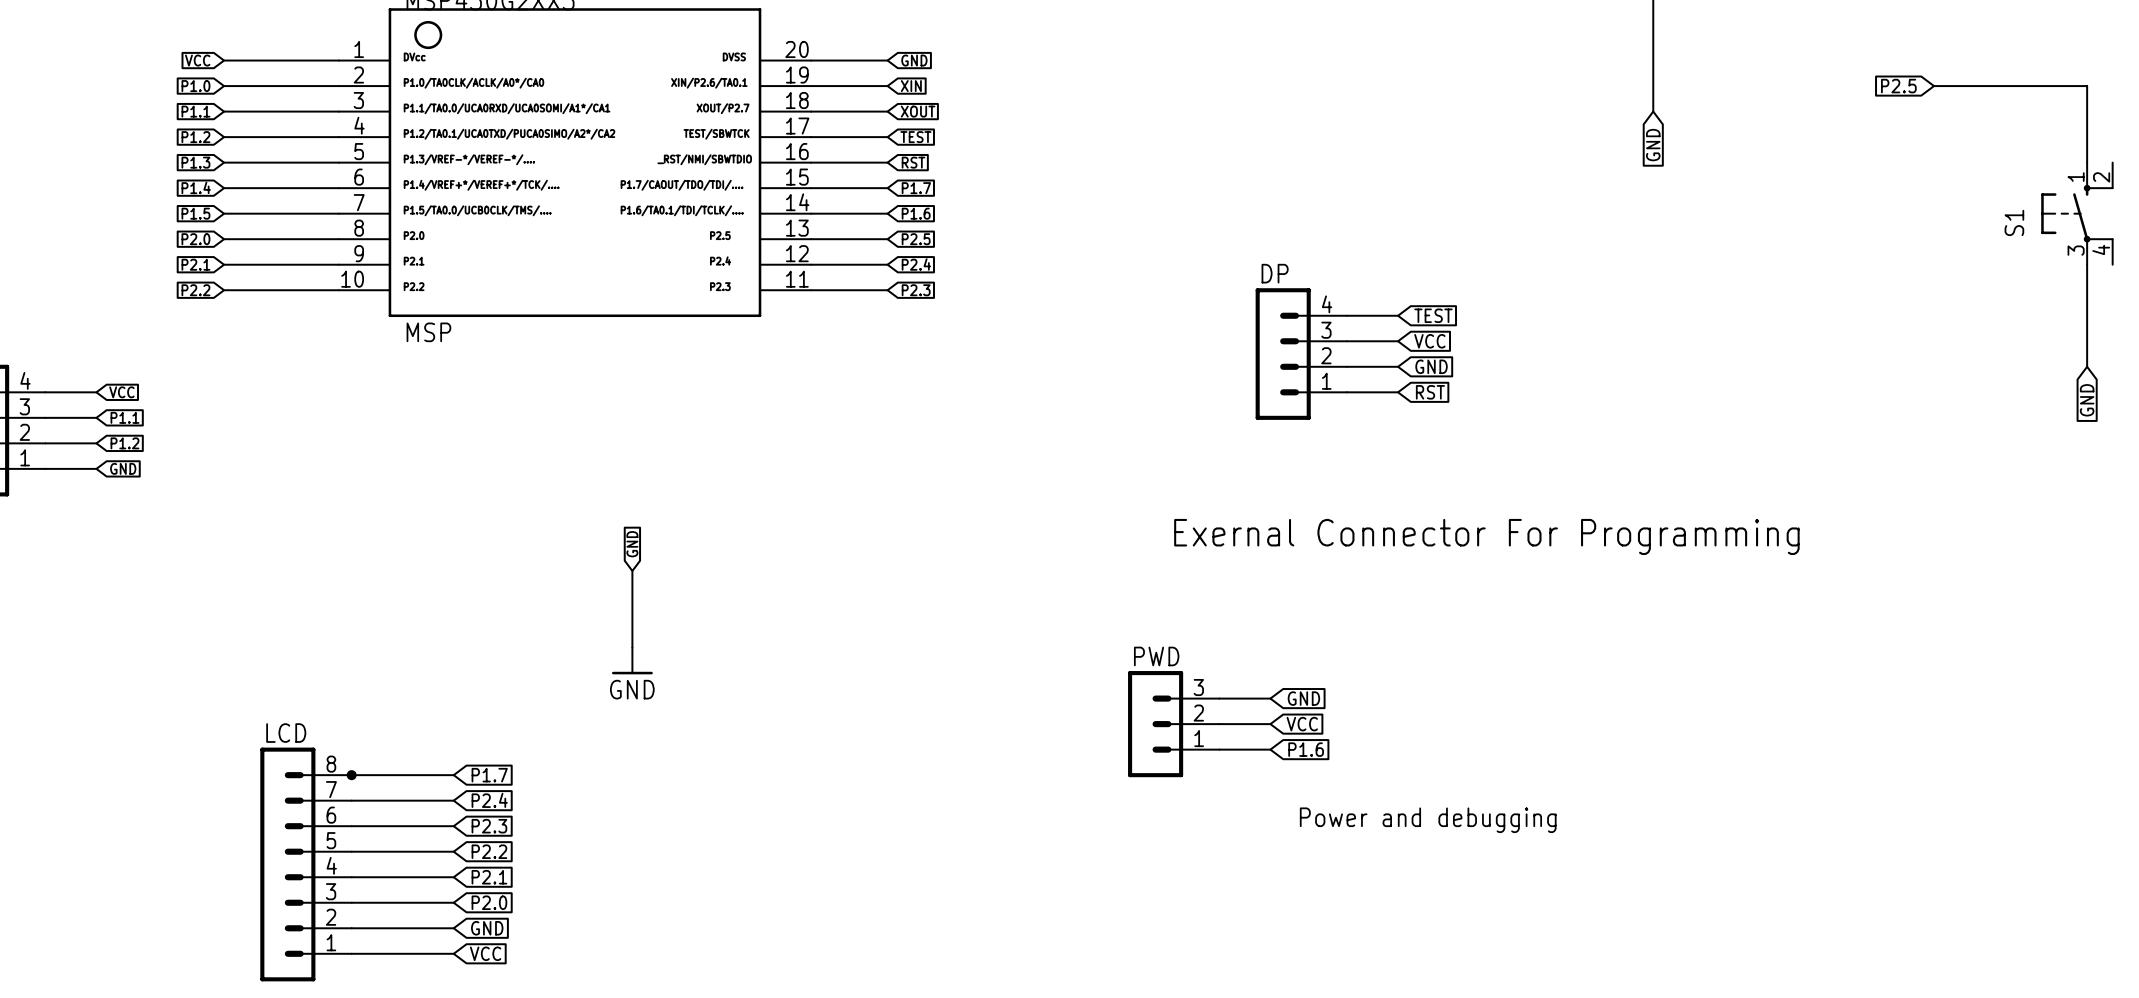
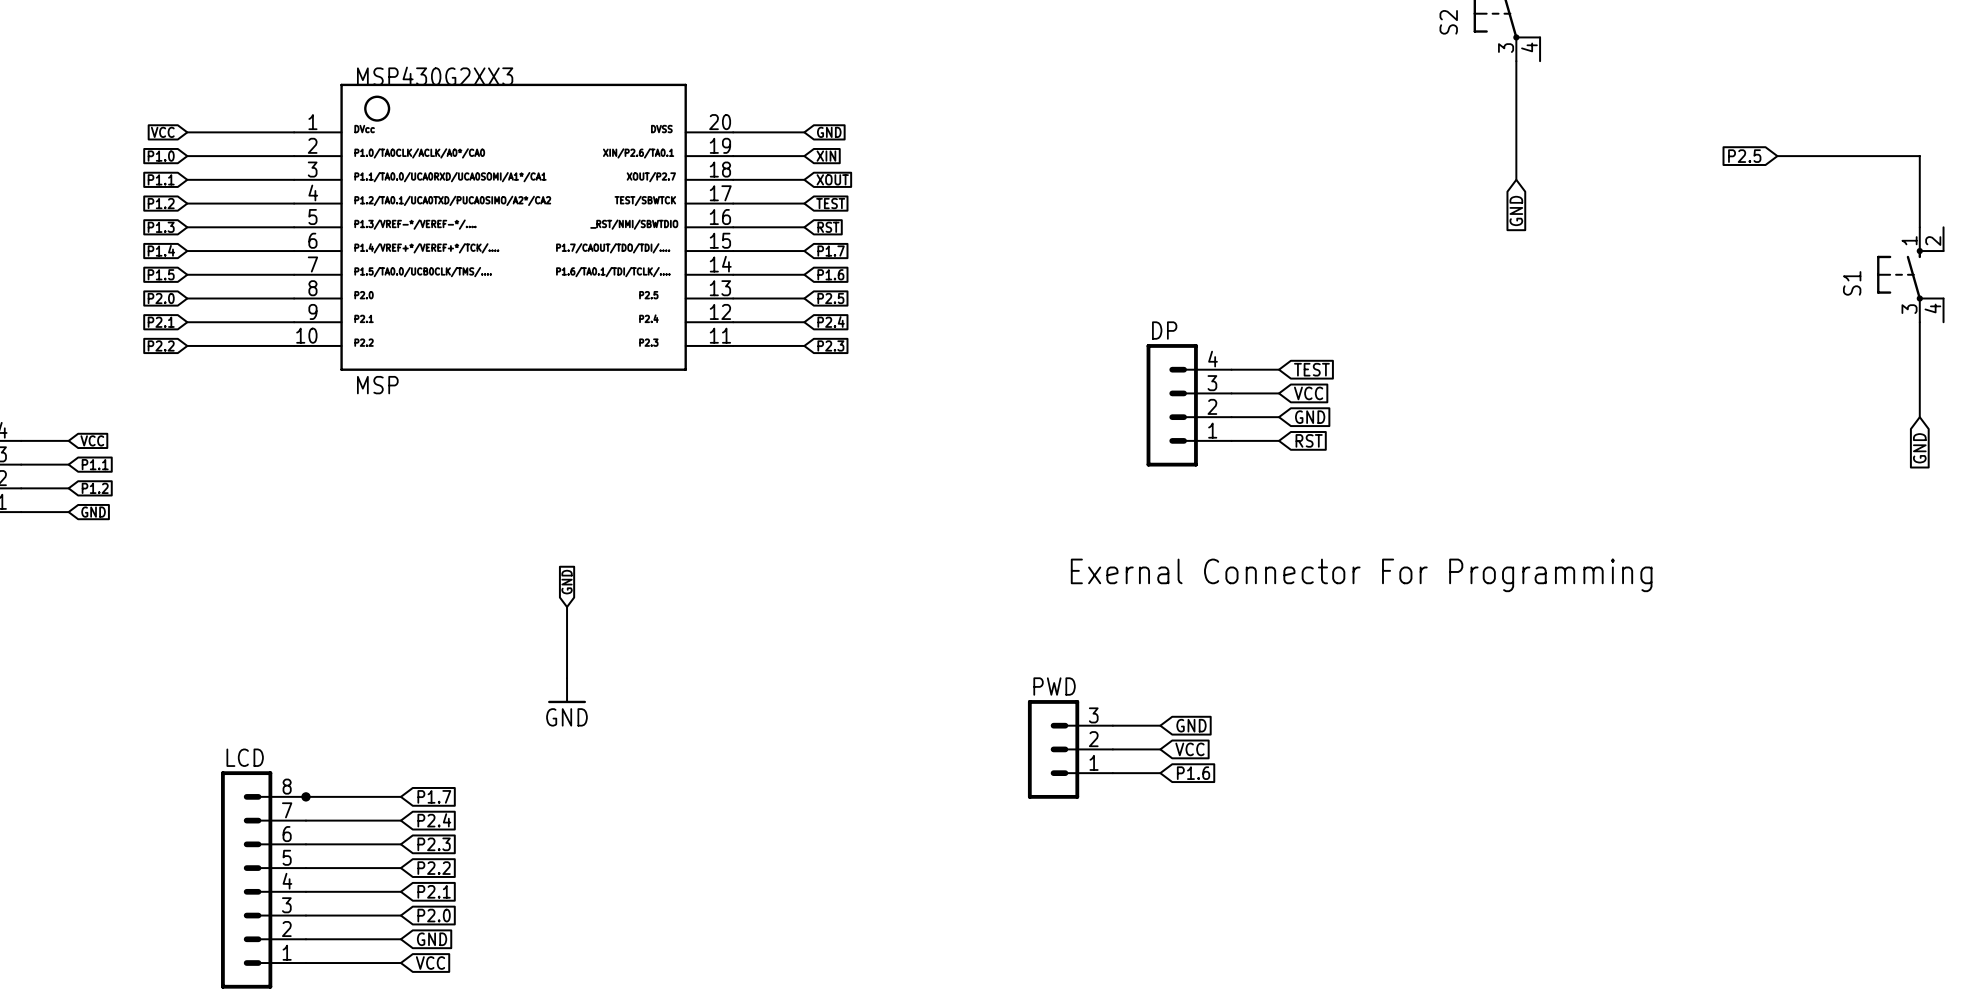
text: Power and debugging (1428, 820) -> none

